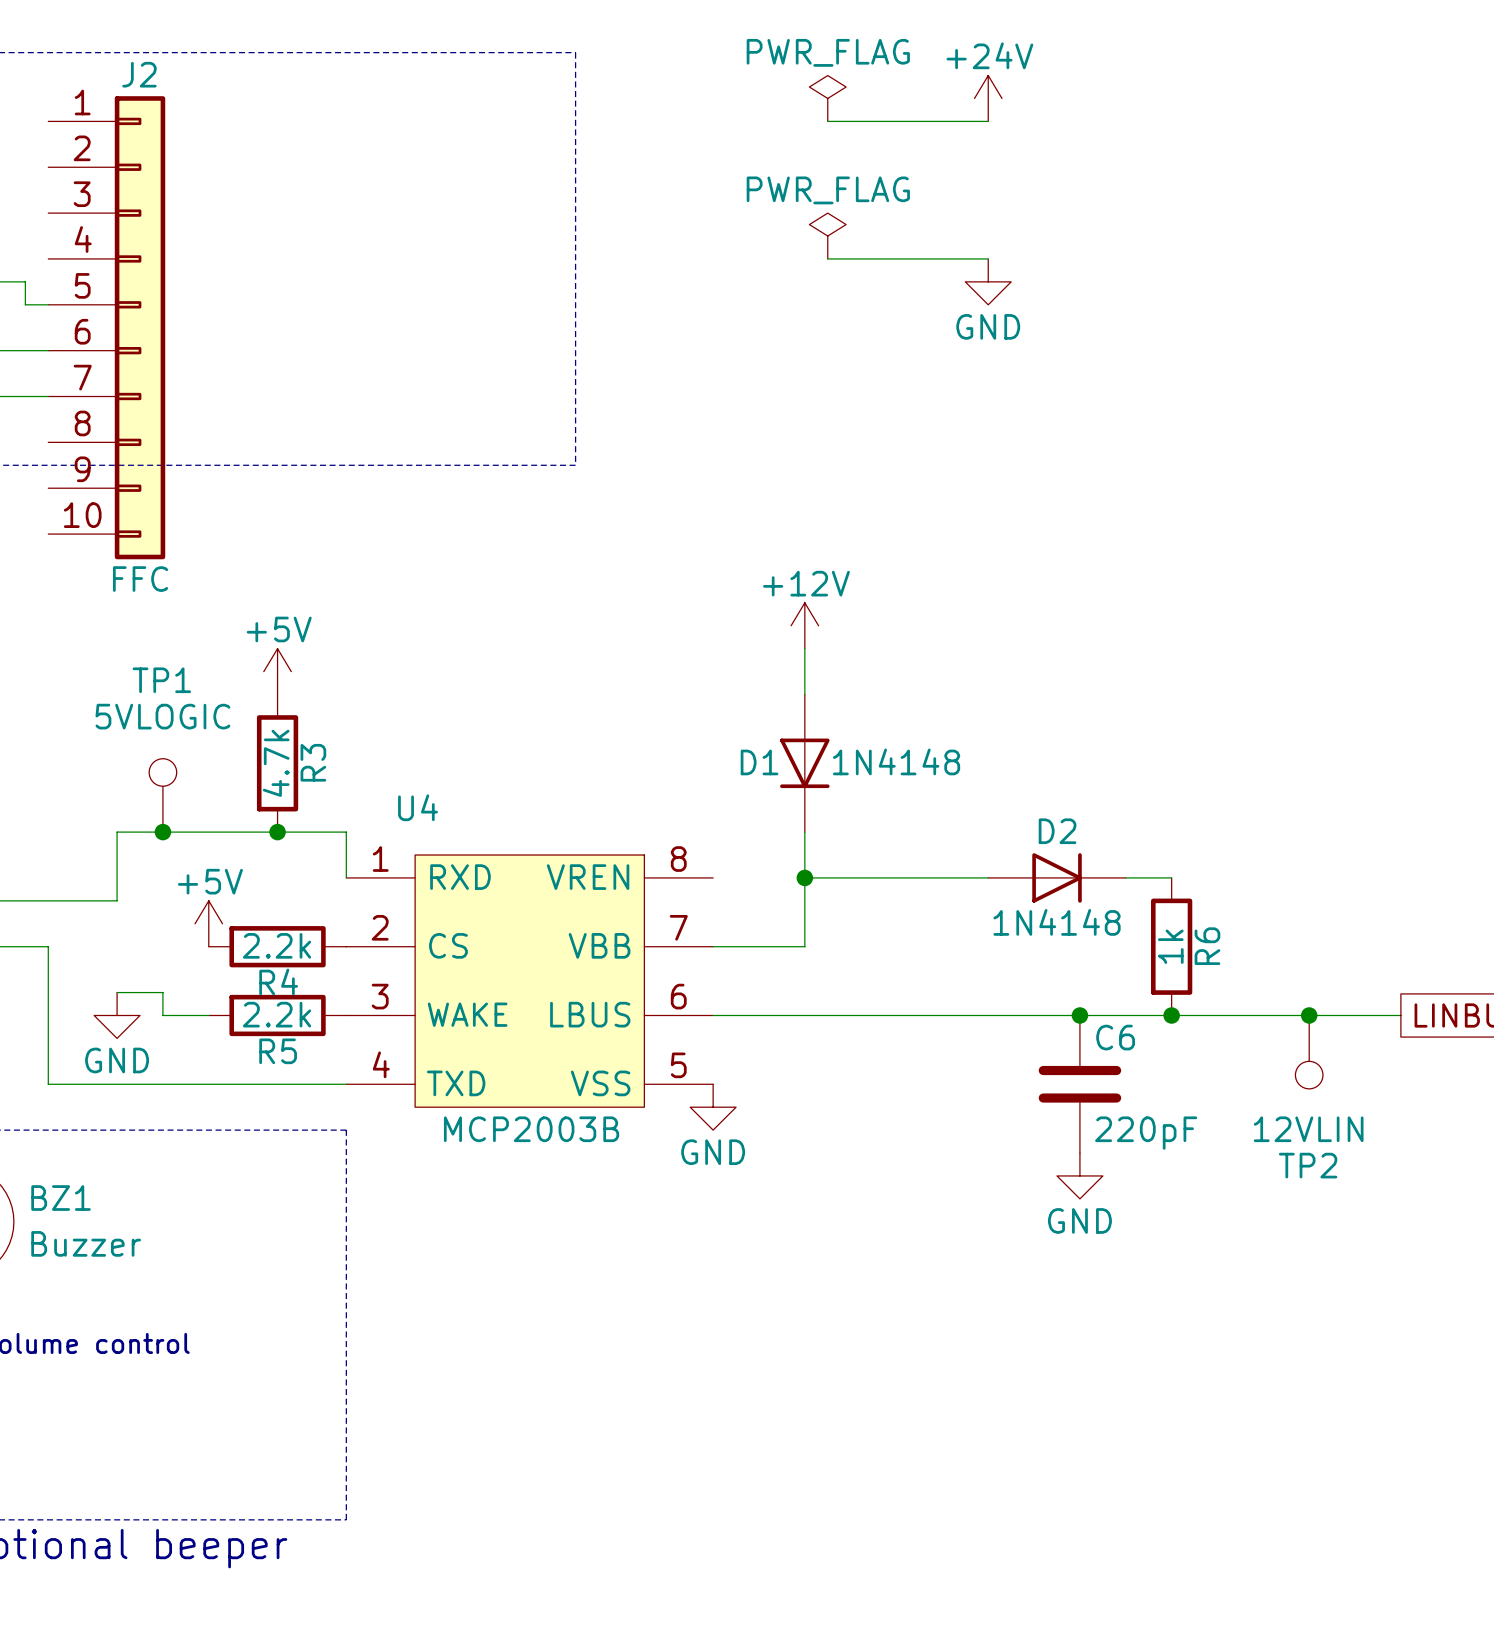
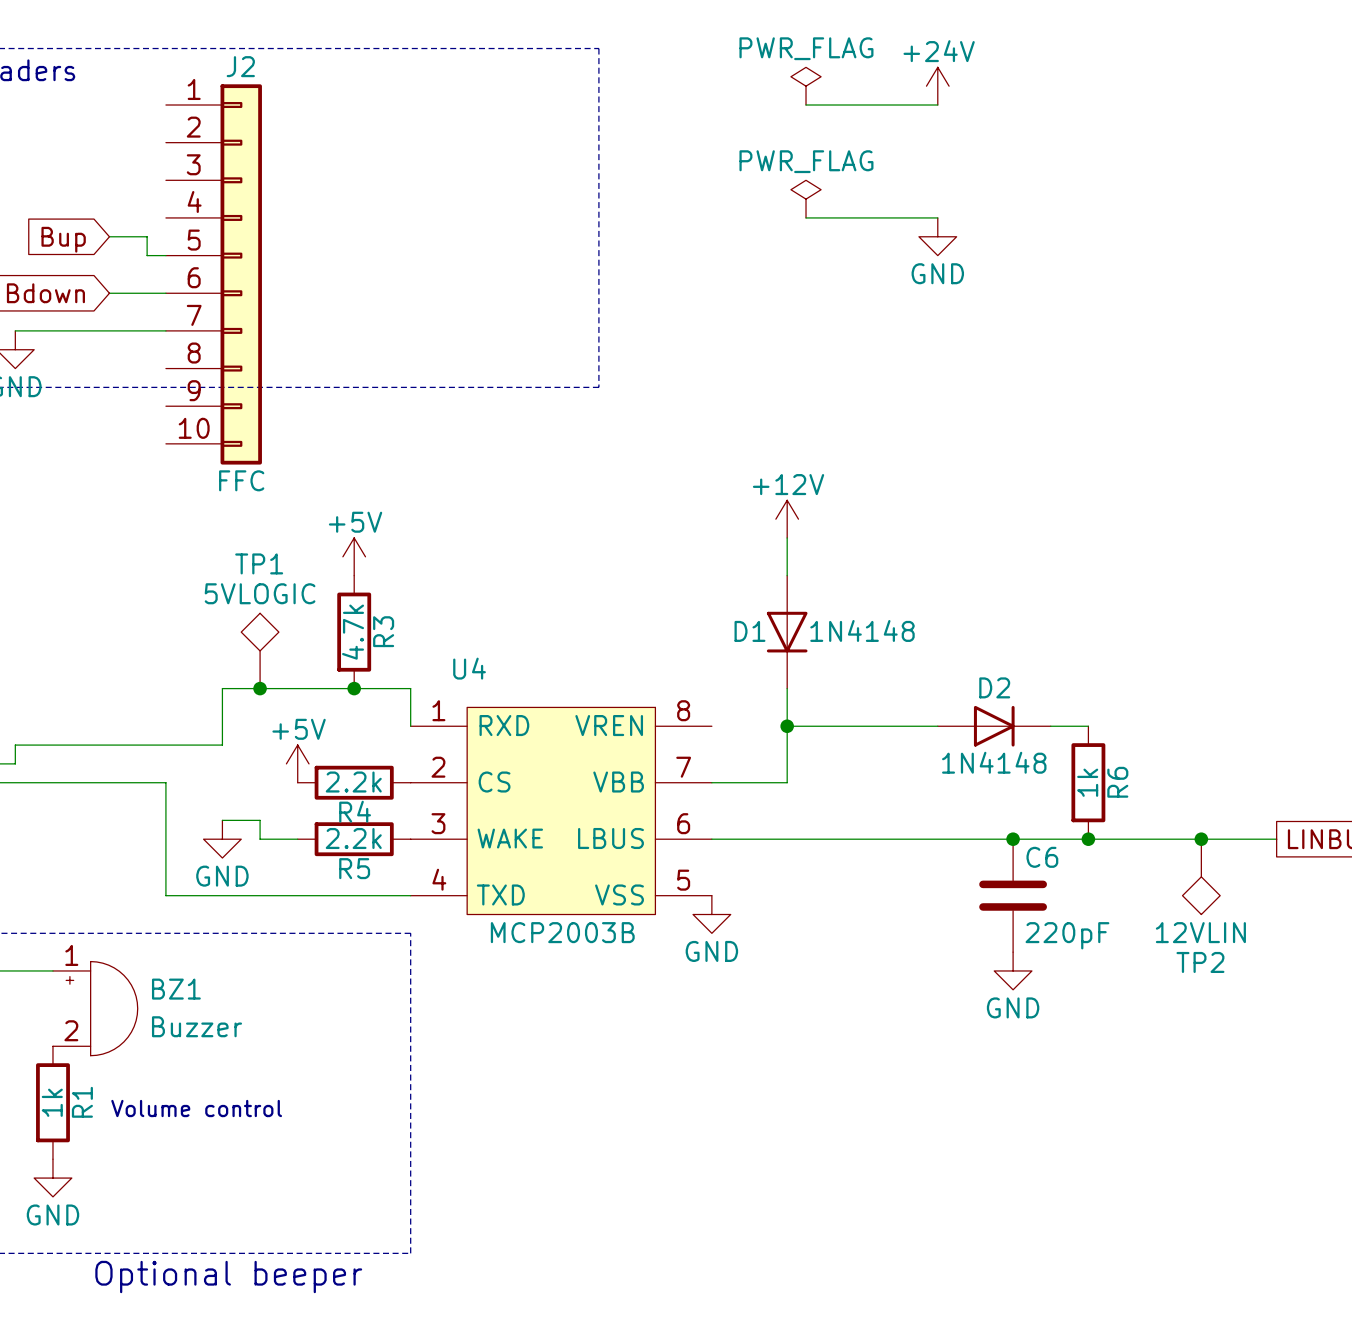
TP1 symbol: [149, 758, 177, 833] -> [241, 613, 279, 689]
TP2 symbol: [1295, 1015, 1323, 1089] -> [1182, 839, 1221, 915]

